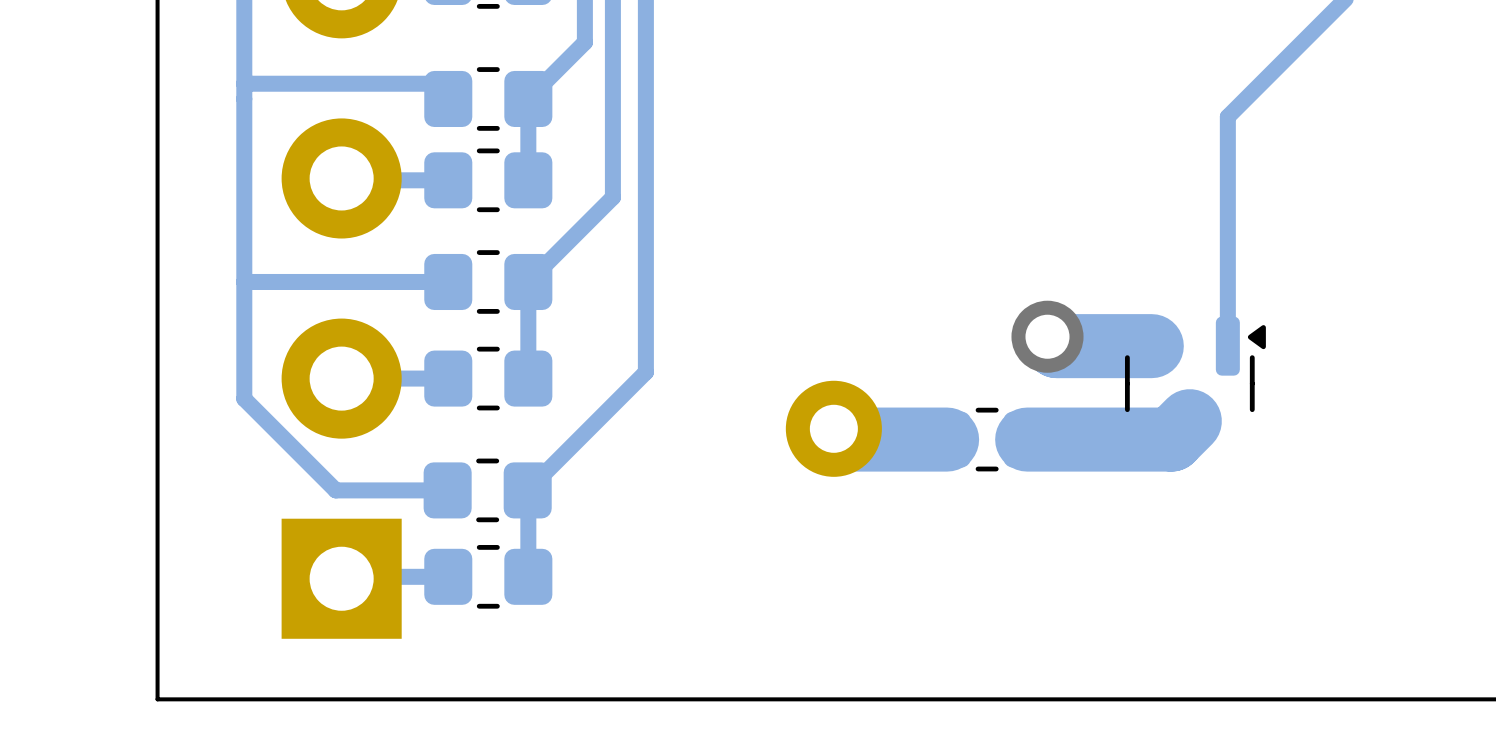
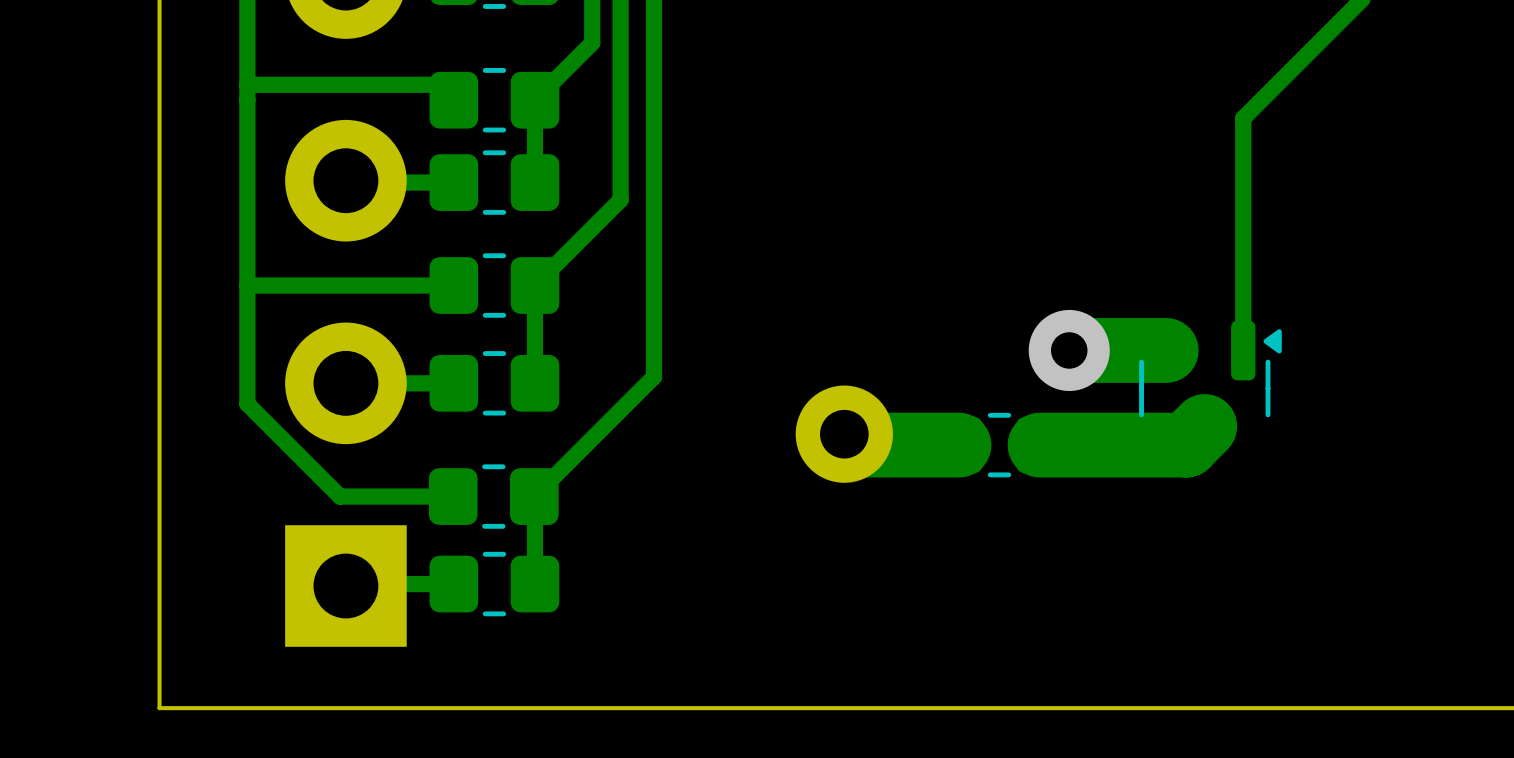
via size: [1011, 300, 1084, 373] -> [1028, 309, 1110, 392]

